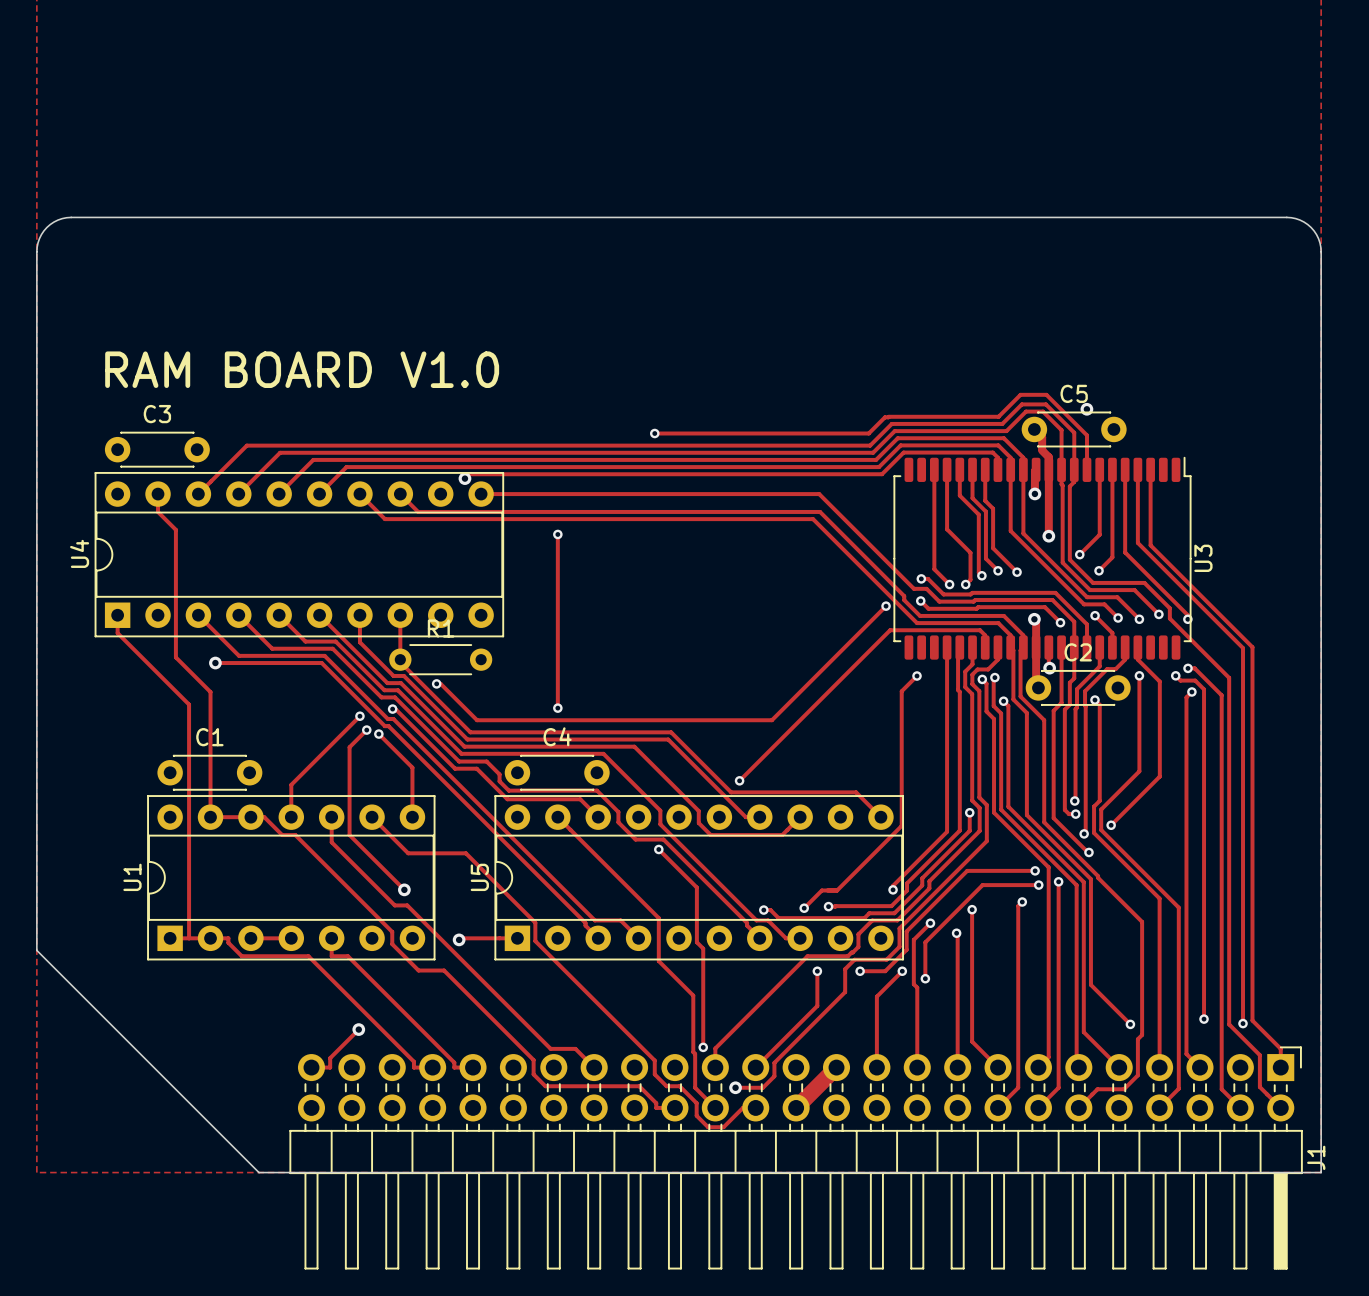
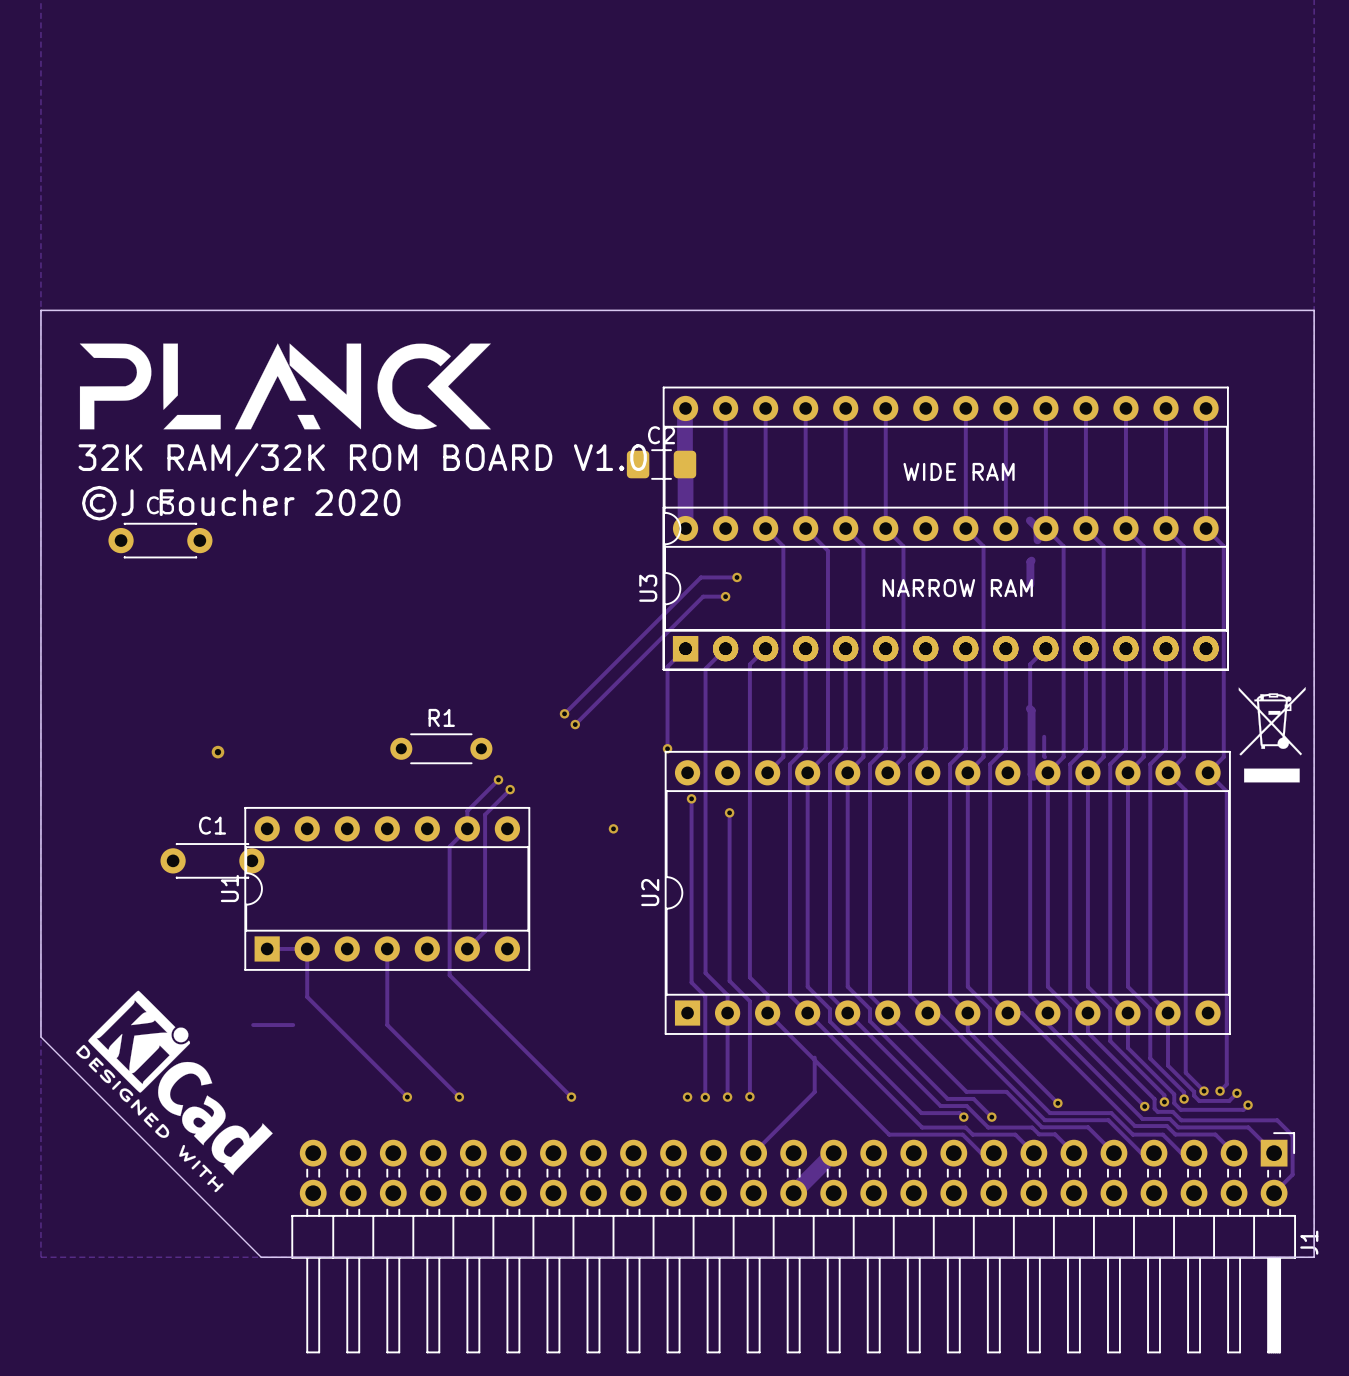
board edge: (71, 217) (58, 220) (46, 227) (39, 238) (36, 251) -> (75, 310) (40, 310) (40, 344)
board edge: (1286, 217) (1299, 220) (1311, 227) (1318, 238) (1321, 251) -> (1280, 310) (1314, 310) (1314, 344)
drawing: none -> [79, 343, 491, 430]
track: none -> (685, 408) (685, 528)
track: none -> (725, 408) (725, 528)
track: none -> (765, 408) (765, 528) (783, 546) (783, 757) (767, 772)
track: none -> (805, 408) (805, 528) (827, 550) (827, 752) (807, 772) (807, 986) (829, 1009) (829, 1021) (921, 1113) (959, 1113) (963, 1117)
track: none -> (845, 408) (845, 528) (863, 546) (863, 757) (847, 772) (847, 986) (870, 1009) (870, 1021) (947, 1098) (973, 1098) (991, 1117)
track: none -> (885, 408) (885, 528) (903, 546) (903, 757) (887, 772)
track: none -> (965, 408) (965, 528) (983, 546) (983, 757) (967, 772) (967, 986) (990, 1009) (990, 1035) (1057, 1103)
track: none -> (1005, 408) (1005, 528)
track: none -> (1045, 408) (1045, 528) (1063, 546) (1063, 757) (1047, 772) (1047, 986) (1070, 1009) (1070, 1031) (1144, 1106)
track: none -> (1085, 408) (1085, 528) (1103, 546) (1103, 757) (1087, 772) (1087, 986) (1110, 1009) (1110, 1041) (1164, 1095) (1164, 1102)
track: none -> (1125, 408) (1125, 528) (1143, 546) (1143, 757) (1127, 772) (1127, 986) (1150, 1009) (1150, 1058) (1184, 1092) (1184, 1099)
track: none -> (1166, 408) (1166, 528) (1183, 546) (1183, 757) (1168, 772) (1185, 790) (1185, 1072) (1204, 1091)
track: none -> (1206, 408) (1206, 528) (1223, 546) (1223, 757) (1208, 772) (1226, 791) (1226, 1084) (1220, 1091)
text: RAM BOARD V1.0 (302, 369) -> 32K RAM/32K ROM BOARD V1.0 (362, 459)
via: (1086, 409) -> none
text: none -> ©J Foucher 2020 (241, 503)
C5: (1074, 429) -> none
track: (654, 433) (868, 433) (884, 417) (998, 416) (1020, 394) (1046, 394) (1087, 435) (1087, 469) -> none
via: (654, 433) -> none
WIDE RAM: none -> (945, 528)
track: (1042, 450) (1048, 457) (1048, 536) -> none
U3 footprint: [893, 456, 1192, 660] -> [662, 506, 1229, 671]
track: (934, 469) (934, 569) (949, 584) -> none
track: (947, 469) (947, 529) (970, 552) (970, 579) (965, 584) -> none
track: (959, 469) (959, 495) (978, 514) (978, 572) (981, 575) -> none
track: (972, 469) (972, 498) (985, 511) (985, 558) (998, 570) -> none
track: (985, 469) (985, 500) (993, 508) (993, 548) (1017, 572) -> none
track: (997, 469) (997, 457) (992, 452) (903, 452) (882, 474) (469, 474) (464, 478) -> none
track: (1099, 469) (1099, 534) (1079, 554) -> none
track: (1112, 469) (1112, 557) (1099, 570) -> none
track: (1125, 469) (1125, 552) (1187, 615) (1187, 619) -> none
track: (1137, 469) (1137, 542) (1243, 648) (1243, 1023) -> none
track: (1150, 469) (1150, 545) (1252, 647) (1252, 1020) (1280, 1048) (1280, 1067) -> (1045, 648) (1030, 664) (1030, 995) (1047, 1013) (1047, 1024) (1142, 1118) (1169, 1118) (1178, 1127) (1248, 1127) (1274, 1153)
via: (464, 478) -> none
track: none -> (737, 577) (700, 577) (564, 713)
via: none -> (737, 577)
via: (1034, 493) -> none
track: (158, 494) (158, 511) (175, 529) (175, 657) (210, 692) (210, 817) (264, 817) (282, 835) (295, 835) (392, 931) (392, 944) (418, 970) (444, 970) (533, 1060) (533, 1074) (545, 1086) (639, 1086) (656, 1103) (656, 1107) (674, 1107) -> none
track: (198, 494) (246, 445) (870, 445) (891, 423) (1002, 423) (1021, 404) (1045, 404) (1074, 432) (1074, 481) (1069, 486) (1069, 559) (1093, 582) (1144, 582) (1169, 608) (1169, 618) (1229, 677) (1229, 1024) (1259, 1055) (1259, 1087) (1280, 1107) -> (1085, 648) (1085, 748) (1070, 764) (1070, 995) (1087, 1013) (1087, 1032) (1154, 1099) (1154, 1108) (1157, 1111) (1172, 1111) (1181, 1120) (1277, 1120) (1292, 1135) (1292, 1174) (1274, 1193)
track: (238, 494) (280, 452) (873, 452) (894, 431) (1006, 431) (1026, 411) (1042, 411) (1061, 430) (1062, 562) (1090, 590) (1134, 590) (1158, 614) -> none
track: (279, 494) (313, 459) (876, 459) (897, 438) (1003, 438) (1023, 457) (1023, 533) (1087, 597) (1117, 597) (1139, 619) -> none
track: (319, 494) (346, 467) (879, 467) (900, 445) (998, 445) (1010, 457) (1010, 530) (1084, 604) (1104, 604) (1118, 617) -> none
track: (359, 494) (384, 519) (813, 519) (917, 623) (998, 623) (1010, 635) (1010, 647) (1013, 650) (1013, 699) (1026, 712) (1026, 815) (1090, 879) (1090, 984) (1130, 1024) -> none
track: (400, 494) (418, 511) (820, 511) (904, 596) (904, 600) (920, 615) (1003, 615) (1023, 635) (1023, 647) (1020, 650) (1020, 696) (1044, 720) (1044, 822) (1142, 921) (1142, 1034) (1137, 1039) (1137, 1075) (1123, 1089) (1097, 1089) (1078, 1107) -> none
track: (481, 494) (819, 494) (913, 588) (926, 588) (939, 601) (1052, 600) (1074, 621) (1074, 678) (1069, 682) (1069, 704) (1064, 709) (1064, 809) (1069, 814) (1075, 814) -> none
text: none -> NARROW RAM (957, 588)
track: none -> (725, 596) (703, 596) (575, 724)
via: none -> (725, 596)
track: (557, 534) (557, 708) -> none
via: (557, 534) -> none
via: (1048, 536) -> none
U4: (299, 554) -> none
via: (1079, 554) -> none
track: none -> (685, 648) (667, 666) (667, 750)
track: none -> (725, 648) (705, 668) (705, 973) (727, 995) (727, 1097)
track: none -> (1005, 648) (1005, 748) (990, 764) (990, 995) (1007, 1013) (1021, 1013) (1134, 1126) (1166, 1126) (1175, 1134) (1215, 1134) (1234, 1153)
track: none -> (1125, 648) (1125, 748) (1110, 764) (1110, 995) (1127, 1013) (1127, 1048) (1174, 1094) (1174, 1103) (1180, 1109) (1243, 1109) (1248, 1105)
track: none -> (1166, 648) (1166, 748) (1150, 764) (1150, 995) (1168, 1013) (1168, 1065) (1194, 1091) (1194, 1095) (1199, 1100) (1229, 1100) (1236, 1093)
U3 name position: U3 (1203, 558) -> U3 (648, 588)
via: (998, 570) -> none
via: (1099, 570) -> none
via: (1017, 572) -> none
via: (981, 575) -> none
track: (921, 578) (928, 578) (943, 594) (1055, 592) (1087, 624) (1087, 647) -> none
via: (921, 578) -> none
via: (949, 584) -> none
via: (965, 584) -> none
drawing: none -> [1238, 687, 1306, 783]
track: (920, 600) (928, 608) (1044, 607) (1060, 622) -> none
via: (920, 600) -> none
track: (886, 606) (771, 720) (477, 720) (440, 683) (436, 683) -> none
via: (886, 606) -> none
via: (1158, 614) -> none
track: (117, 615) (117, 633) (189, 704) (189, 938) -> none
track: (198, 615) (239, 655) (324, 655) (387, 719) (393, 719) (594, 920) (620, 920) (638, 938) -> none
track: (238, 615) (272, 648) (332, 648) (381, 697) (395, 697) (459, 761) (486, 761) (499, 774) (499, 781) (508, 790) (597, 790) (618, 812) (618, 822) (635, 839) (663, 839) (747, 923) (747, 925) (759, 938) -> none
track: (279, 615) (305, 641) (335, 641) (384, 690) (398, 690) (461, 753) (603, 753) (660, 810) (660, 824) (756, 920) (768, 920) (786, 938) (800, 938) -> none
track: (319, 615) (387, 683) (400, 683) (464, 746) (634, 746) (698, 811) (698, 823) (710, 835) (782, 835) (800, 817) -> none
track: (359, 615) (359, 642) (393, 675) (403, 675) (467, 739) (668, 739) (745, 817) (759, 817) -> none
track: (400, 615) (400, 662) (470, 732) (671, 732) (731, 792) (856, 792) (880, 817) -> none
track: (1095, 615) (1112, 633) (1112, 647) -> none
via: (1095, 615) -> none
via: (1118, 617) -> none
via: (1034, 619) -> none
via: (1139, 619) -> none
via: (1187, 619) -> none
via: (1060, 622) -> none
via: none -> (564, 713)
via: none -> (575, 724)
track: (1099, 637) (1099, 666) (1077, 689) (1074, 801) -> none
track: (947, 647) (947, 831) (893, 885) (893, 889) -> none
track: (959, 647) (958, 649) (959, 830) (907, 883) (907, 890) (891, 906) (828, 906) -> none
track: (972, 647) (972, 664) (965, 671) (965, 687) (972, 694) (972, 800) (979, 807) (979, 831) (929, 881) (929, 888) (897, 920) (872, 920) (858, 934) (858, 946) (847, 956) (807, 956) (715, 1048) (715, 1067) -> none
track: (985, 647) (985, 635) (980, 630) (890, 630) (739, 780) -> none
track: (997, 647) (997, 659) (988, 669) (977, 669) (972, 674) (972, 684) (979, 691) (979, 797) (986, 805) (986, 841) (899, 928) (899, 946) (886, 959) (854, 959) (845, 969) (845, 992) (774, 1062) (774, 1076) (762, 1087) (735, 1087) -> none
track: (1061, 647) (1061, 702) (1053, 710) (1053, 818) (1088, 852) -> none
track: (1125, 647) (1125, 659) (1115, 669) (1107, 669) (1085, 691) (1085, 832) (1084, 833) -> none
track: (1137, 647) (1137, 659) (1159, 681) (1159, 776) (1111, 825) -> none
via: none -> (667, 748)
track: (215, 663) (321, 663) (384, 726) (388, 726) (585, 923) (585, 925) (598, 938) -> none
via: (1049, 668) -> none
track: (1188, 668) (1194, 668) (1221, 695) (1221, 1089) (1240, 1107) -> none
via: (1188, 668) -> none
C2 footprint: [1025, 669, 1131, 706] -> [626, 449, 697, 480]
track: (1139, 675) (1139, 771) (1101, 809) (1101, 830) (1178, 907) (1178, 1088) (1159, 1107) -> none
via: (1139, 675) -> none
track: (1175, 675) (1180, 680) (1195, 680) (1204, 689) (1204, 1019) -> none
via: (1175, 675) -> none
track: (917, 676) (901, 691) (901, 825) (837, 890) (821, 890) (804, 908) -> none
via: (917, 676) -> none
track: (994, 677) (993, 705) (1001, 713) (1001, 809) (1076, 885) (1076, 1065) -> (845, 648) (845, 748) (829, 764) (829, 995) (940, 1106) (966, 1106) (988, 1127) (1032, 1127) (1039, 1134) (1055, 1134) (1071, 1150)
via: (994, 677) -> none
track: (982, 679) (986, 683) (986, 711) (994, 718) (994, 812) (1048, 867) (1048, 1057) (1038, 1067) -> (805, 648) (805, 748) (789, 764) (789, 995) (922, 1127) (965, 1127) (972, 1134) (1015, 1134) (1033, 1153)
via: (982, 679) -> none
via: (436, 683) -> none
track: none -> (498, 779) (467, 811) (467, 828) (449, 846) (449, 975) (571, 1097)
via: none -> (498, 779)
track: (1191, 691) (1186, 697) (1186, 1054) (1199, 1067) -> (965, 648) (965, 748) (950, 764) (950, 995) (967, 1013) (967, 1030) (1050, 1113) (1111, 1113) (1132, 1134) (1162, 1134) (1181, 1153) (1194, 1153)
via: (1191, 691) -> none
track: none -> (510, 789) (485, 814) (485, 931) (467, 948)
via: none -> (510, 789)
track: (1094, 700) (1099, 704) (1099, 800) (1094, 806) (1094, 832) (1159, 898) (1159, 1067) -> (925, 648) (925, 748) (910, 764) (910, 995) (927, 1013) (937, 1013) (1044, 1120) (1108, 1120) (1141, 1153) (1153, 1153)
via: (1094, 700) -> none
track: (1003, 701) (1008, 705) (1008, 806) (1083, 882) (1083, 1032) (1093, 1041) -> (885, 648) (885, 748) (870, 764) (870, 995) (966, 1091) (1006, 1091) (1042, 1127) (1088, 1127)
via: (1003, 701) -> none
via: (557, 708) -> none
track: (392, 709) (395, 709) (455, 768) (476, 768) (507, 799) (580, 799) (598, 817) -> none
via: (392, 709) -> none
track: none -> (691, 798) (691, 982) (705, 996) (705, 1097)
via: none -> (691, 798)
track: (359, 716) (291, 784) (291, 817) -> none
via: (359, 716) -> none
track: none -> (729, 812) (729, 980) (749, 1001) (749, 1096)
via: none -> (729, 812)
track: (366, 730) (349, 747) (349, 835) (404, 889) -> none
via: (366, 730) -> none
track: (378, 734) (412, 767) (412, 817) -> none
via: (378, 734) -> none
via: none -> (613, 828)
C4: (557, 772) -> none
via: (739, 780) -> none
via: (1074, 801) -> none
U2: none -> (947, 892)
track: (969, 812) (969, 830) (922, 878) (922, 885) (894, 913) (869, 913) (864, 918) (778, 918) (770, 910) (763, 910) -> none
via: (969, 812) -> none
via: (1075, 814) -> none
track: (331, 817) (331, 842) (394, 905) (407, 905) (550, 1048) (575, 1048) (594, 1067) -> none
track: (372, 817) (408, 853) (465, 853) (535, 922) (535, 941) (654, 1060) (654, 1074) (666, 1086) (679, 1086) (696, 1103) (696, 1115) (708, 1127) (723, 1127) (742, 1107) (755, 1107) -> none
track: (557, 817) (658, 918) (658, 961) (693, 995) (695, 1087) (715, 1107) -> none
via: (1111, 825) -> none
via: (1084, 833) -> none
track: (658, 849) (696, 887) (696, 942) (703, 948) (703, 1047) -> none
via: (658, 849) -> none
via: (1088, 852) -> none
track: none -> (267, 948) (307, 948) (307, 997) (407, 1097)
track: none -> (387, 948) (387, 1025) (459, 1097)
track: (1035, 870) (967, 870) (906, 931) (906, 949) (885, 971) (860, 971) -> none
via: (1035, 870) -> none
U1 position: (291, 877) -> (387, 888)
U5: (699, 877) -> none
track: (1058, 881) (1058, 1087) (1038, 1107) -> none
via: (1058, 881) -> none
track: (1038, 885) (982, 885) (925, 942) (925, 978) -> none
via: (1038, 885) -> none
via: (404, 889) -> none
via: (893, 889) -> none
track: (1022, 901) (1018, 906) (1018, 1087) (998, 1107) -> none
via: (1022, 901) -> none
drawing: none -> [76, 990, 273, 1193]
via: (828, 906) -> none
via: (804, 908) -> none
track: (972, 909) (972, 1041) (998, 1067) -> (765, 648) (749, 664) (749, 977) (767, 995) (767, 1013) (889, 1134) (962, 1134) (981, 1153) (993, 1153)
via: (972, 909) -> none
via: (763, 910) -> none
track: (930, 923) (913, 939) (913, 984) (917, 987) (917, 1067) -> none
via: (930, 923) -> none
track: (956, 933) (957, 1067) -> none
via: (956, 933) -> none
track: (170, 938) (228, 938) (228, 942) (241, 956) (308, 956) (413, 1061) (413, 1067) (432, 1067) -> none
track: (331, 938) (331, 956) (347, 956) (454, 1062) (454, 1067) (473, 1067) -> none
track: (517, 938) (460, 938) (459, 939) -> none
via: (459, 939) -> none
via: (817, 971) -> none
via: (860, 971) -> none
track: (902, 971) (876, 996) (876, 1067) -> none
via: (902, 971) -> none
via: (925, 978) -> none
via: none -> (1204, 1091)
via: none -> (1220, 1091)
via: none -> (1236, 1093)
via: none -> (749, 1096)
via: none -> (407, 1097)
via: none -> (459, 1097)
via: none -> (571, 1097)
via: none -> (687, 1097)
via: none -> (705, 1097)
via: none -> (727, 1097)
via: none -> (1184, 1099)
via: none -> (1164, 1102)
via: none -> (1057, 1103)
via: (1204, 1019) -> none
via: none -> (1248, 1105)
via: none -> (1144, 1106)
via: (1243, 1023) -> none
via: (1130, 1024) -> none
track: (358, 1029) (330, 1058) (330, 1067) (311, 1067) -> none
via: (358, 1029) -> none
via: none -> (963, 1117)
via: none -> (991, 1117)
via: (703, 1047) -> none
via: (735, 1087) -> none

